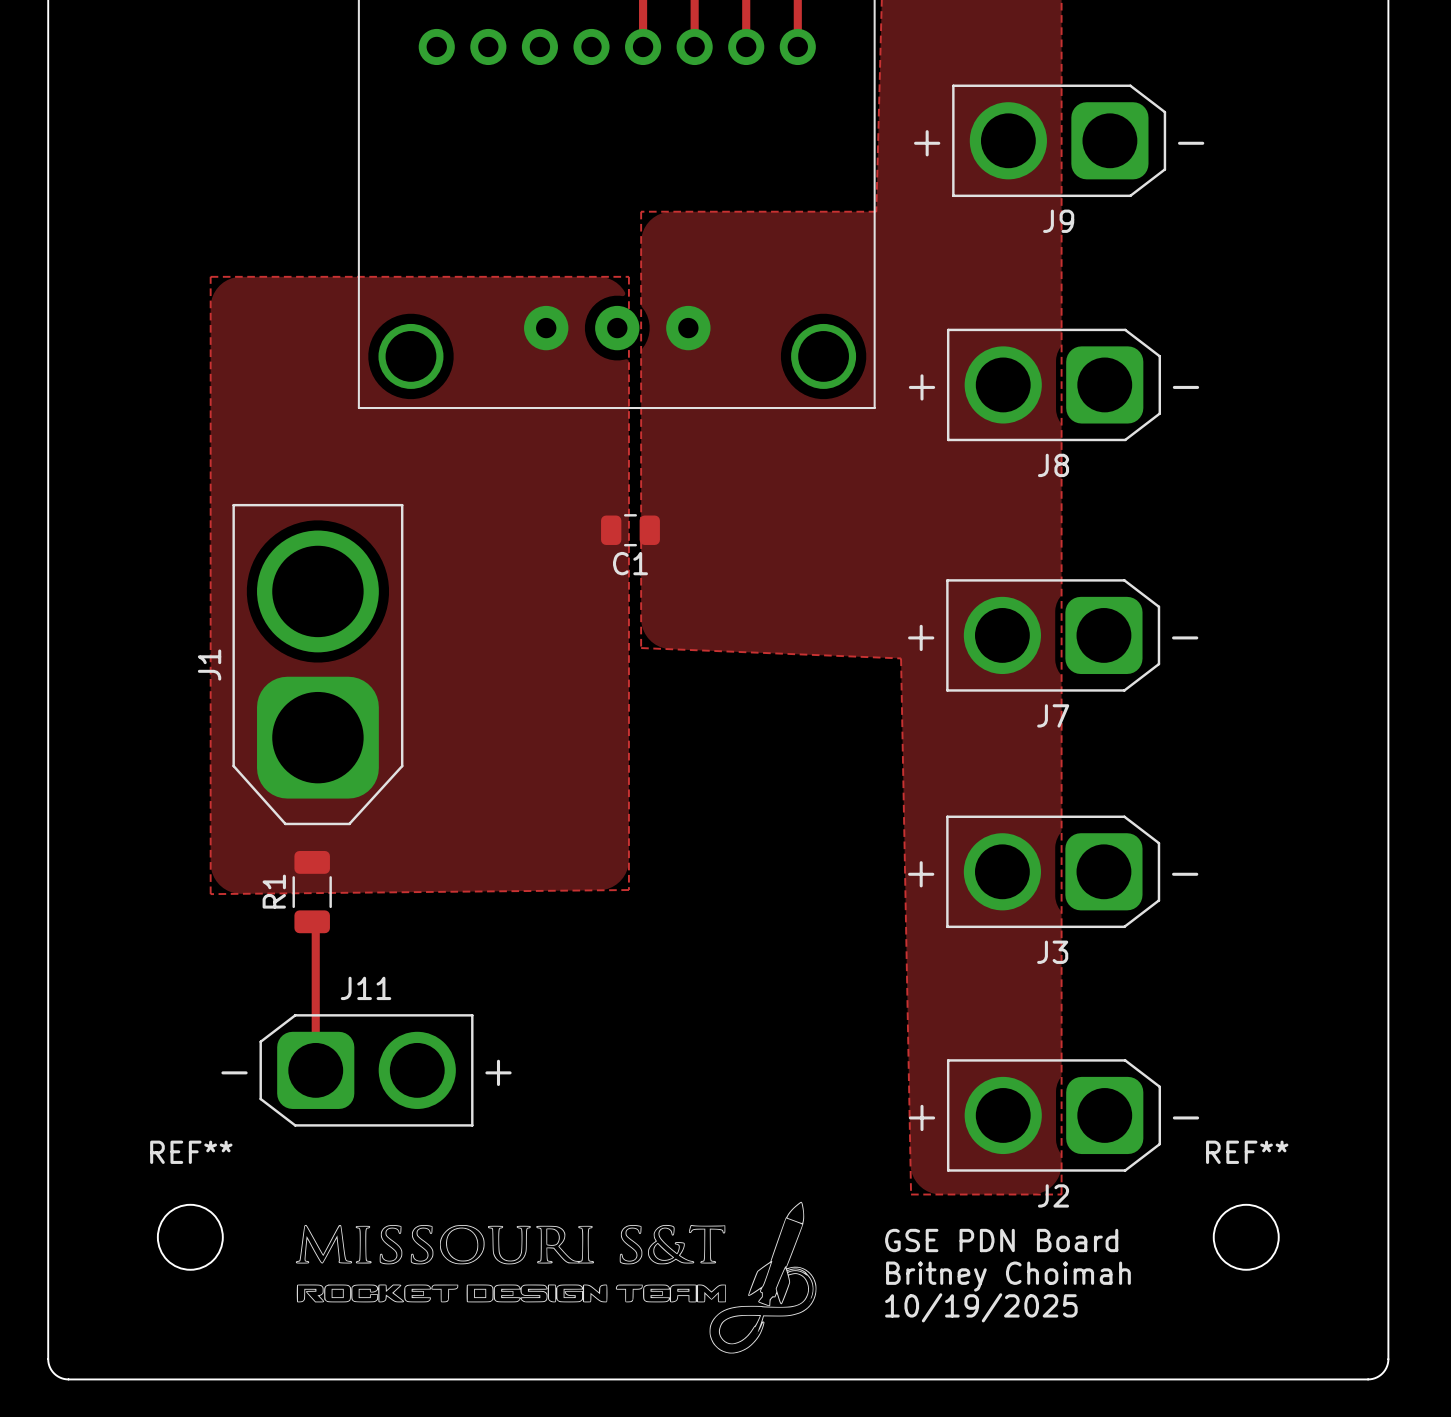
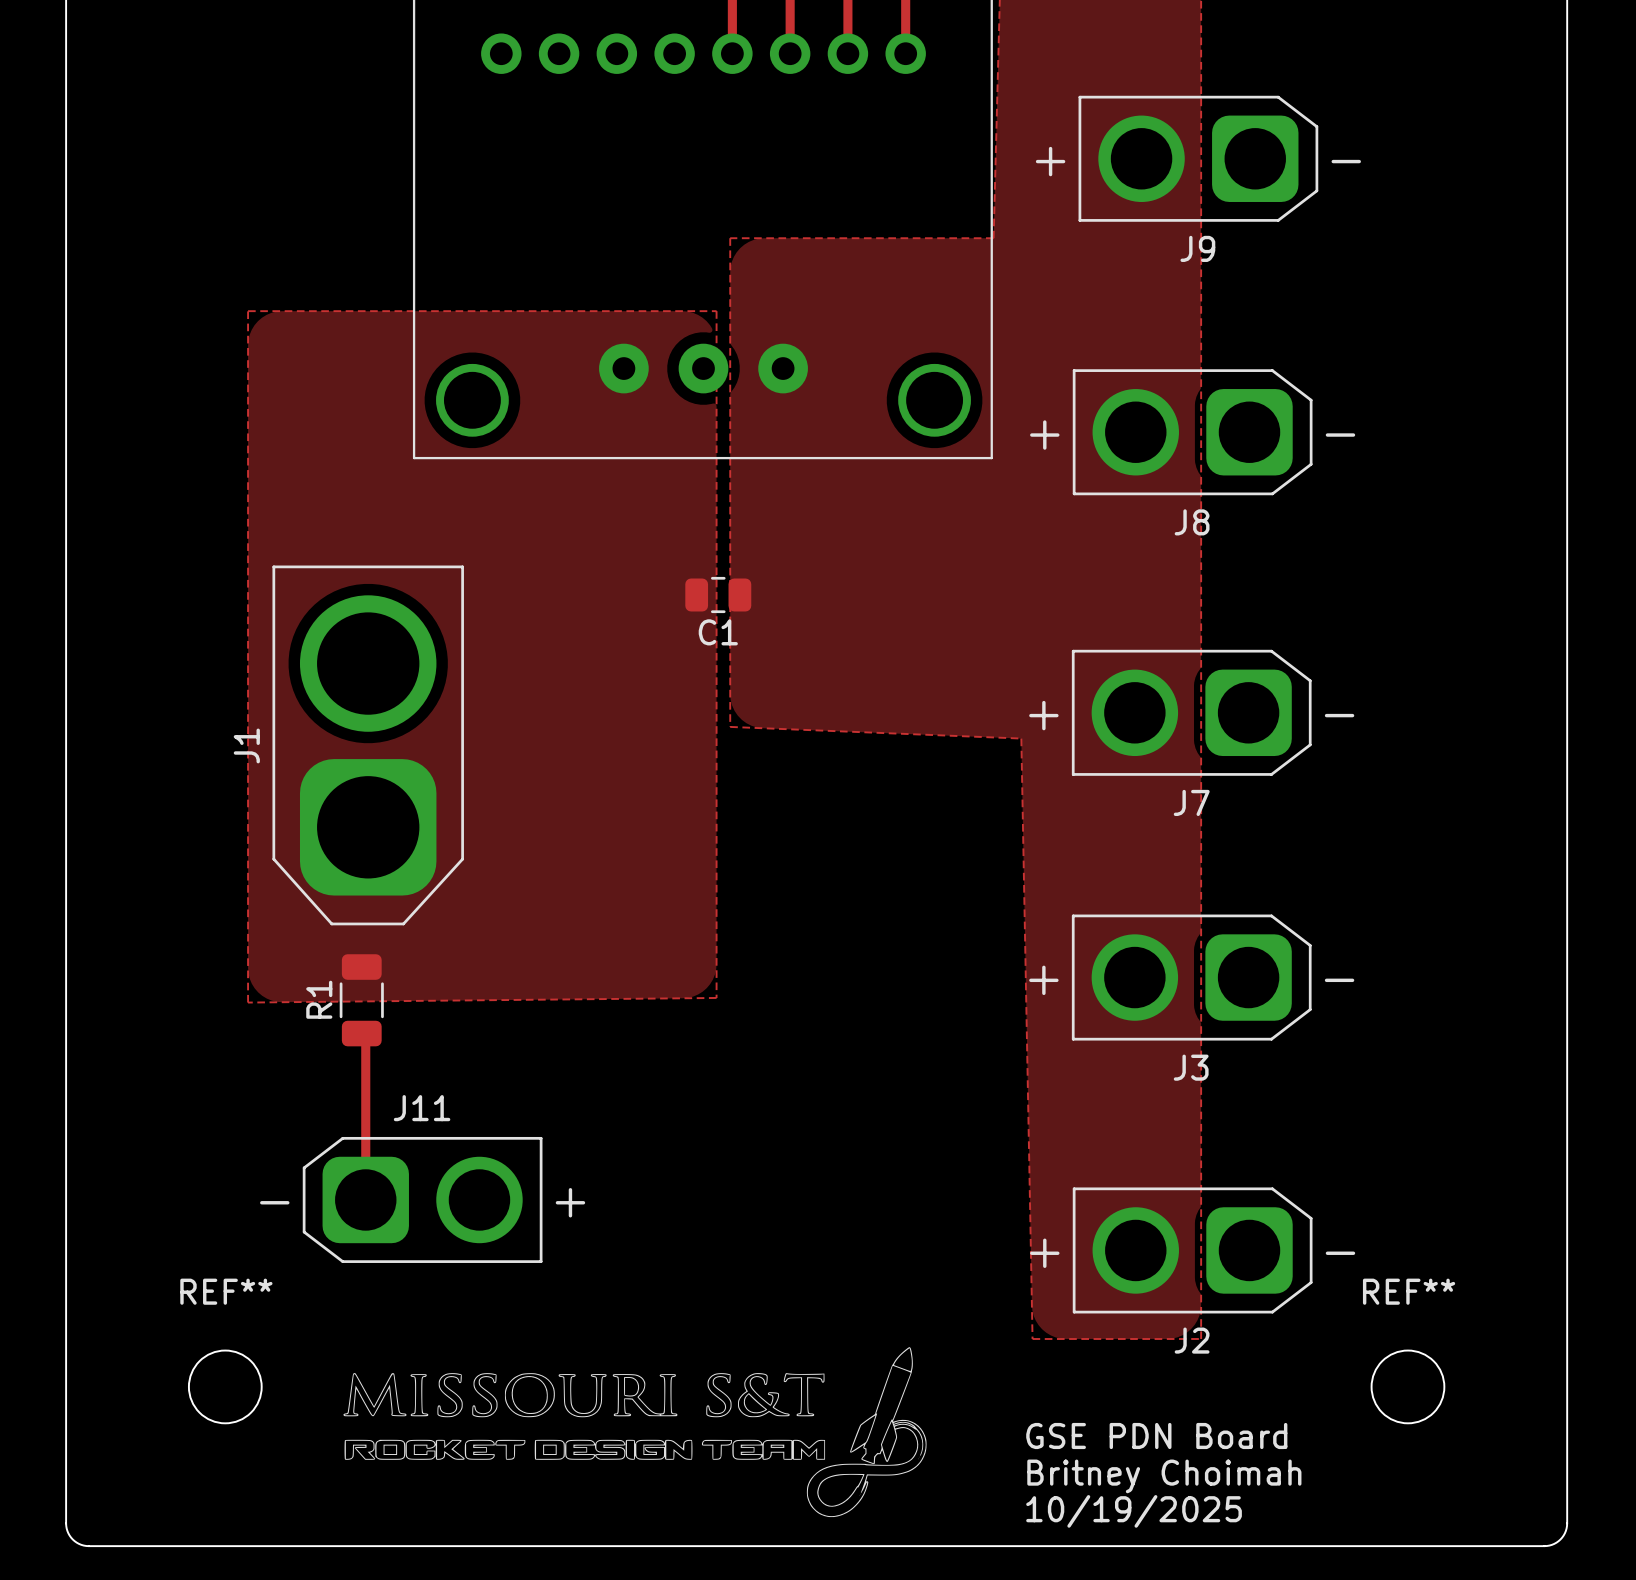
text position: GSE PDN Board (1001, 1240) -> GSE PDN Board (1156, 1436)
text position: Britney Choimah (1008, 1276) -> Britney Choimah (1164, 1476)
text position: 10/19/2025 (981, 1307) -> 10/19/2025 (1134, 1511)

